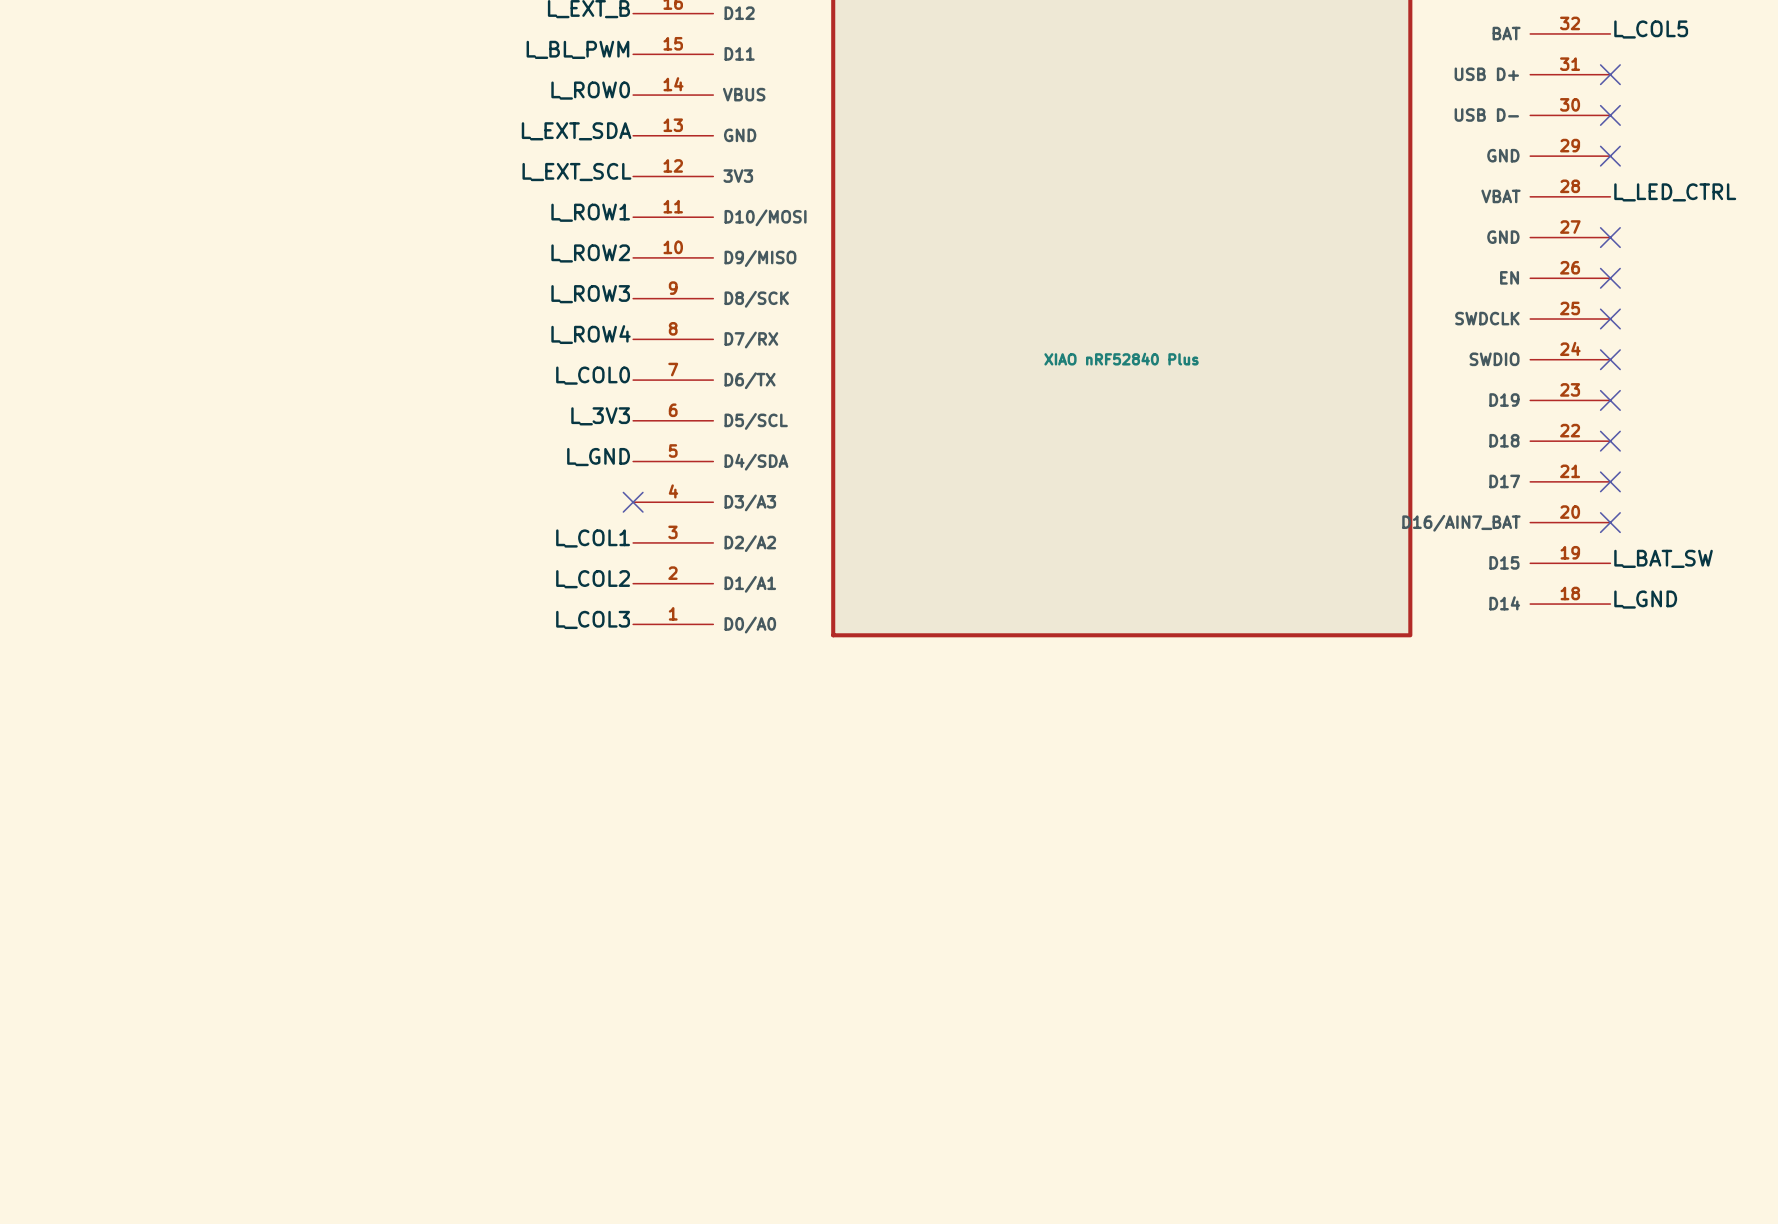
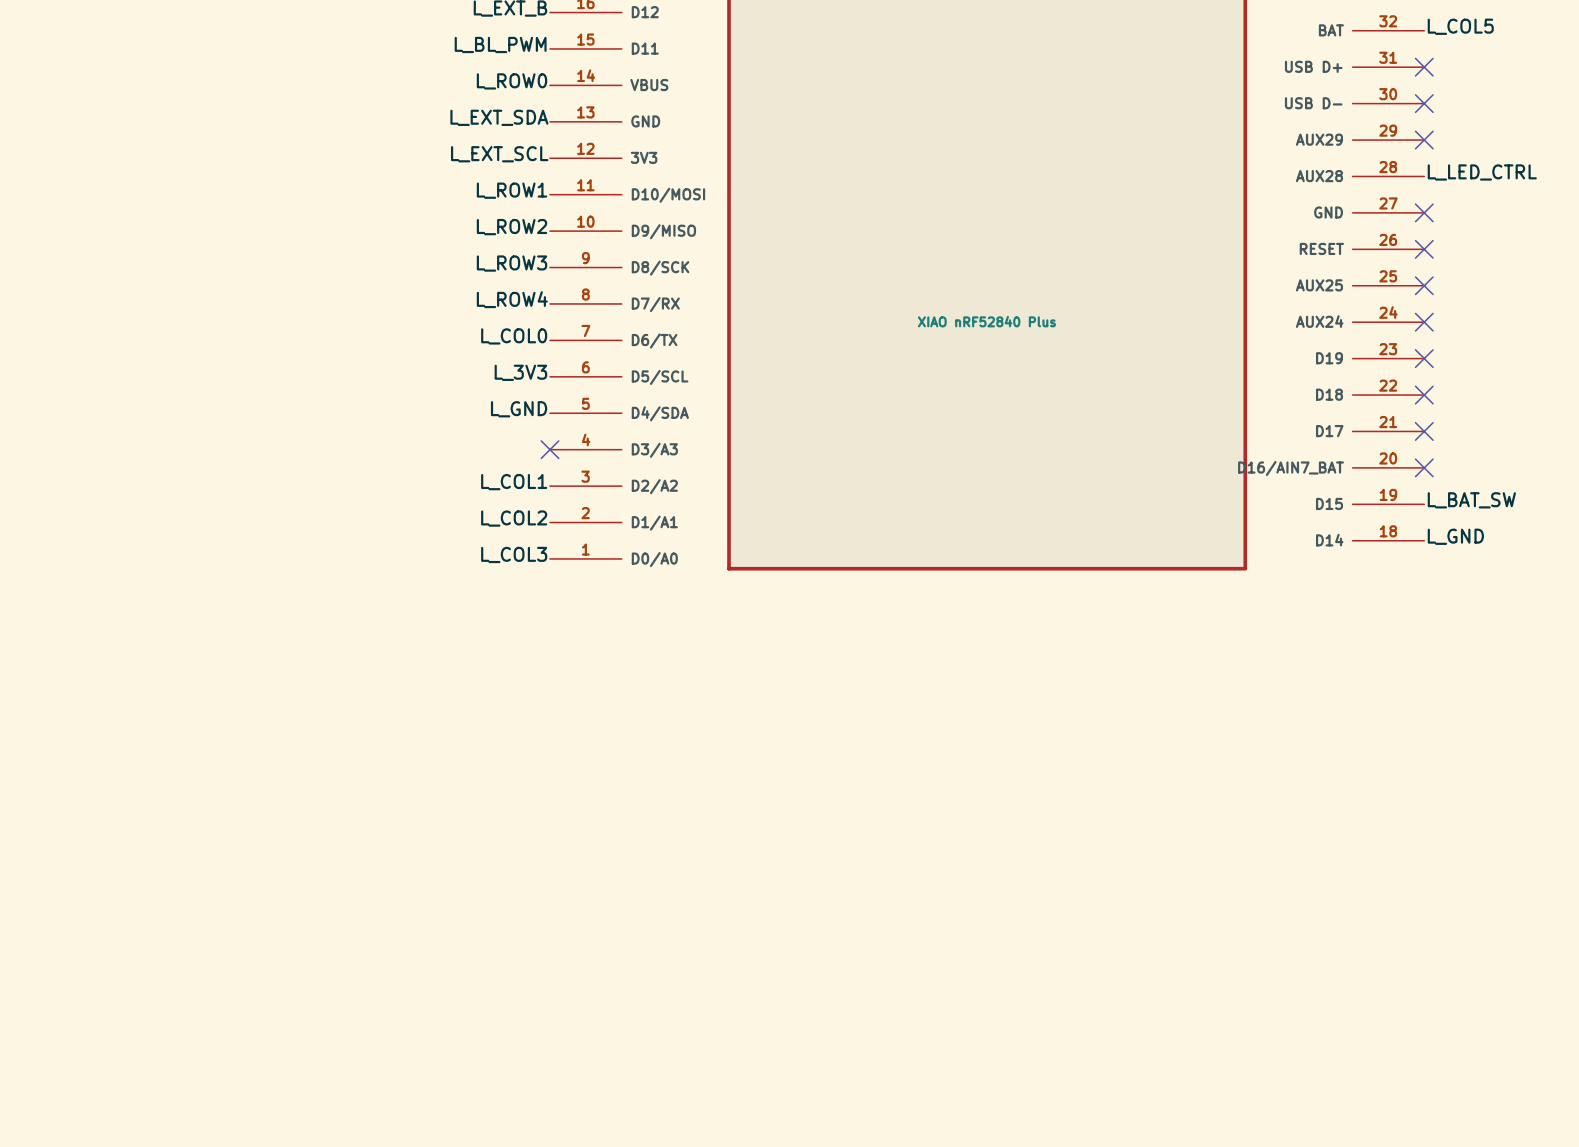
part pin name: GND (1503, 155) -> AUX29 (1319, 139)
part pin name: VBAT (1500, 196) -> AUX28 (1319, 176)
part pin name: EN (1509, 277) -> RESET (1321, 248)
part pin name: SWDCLK (1487, 318) -> AUX25 (1319, 285)
part pin name: SWDIO (1494, 359) -> AUX24 (1319, 321)

